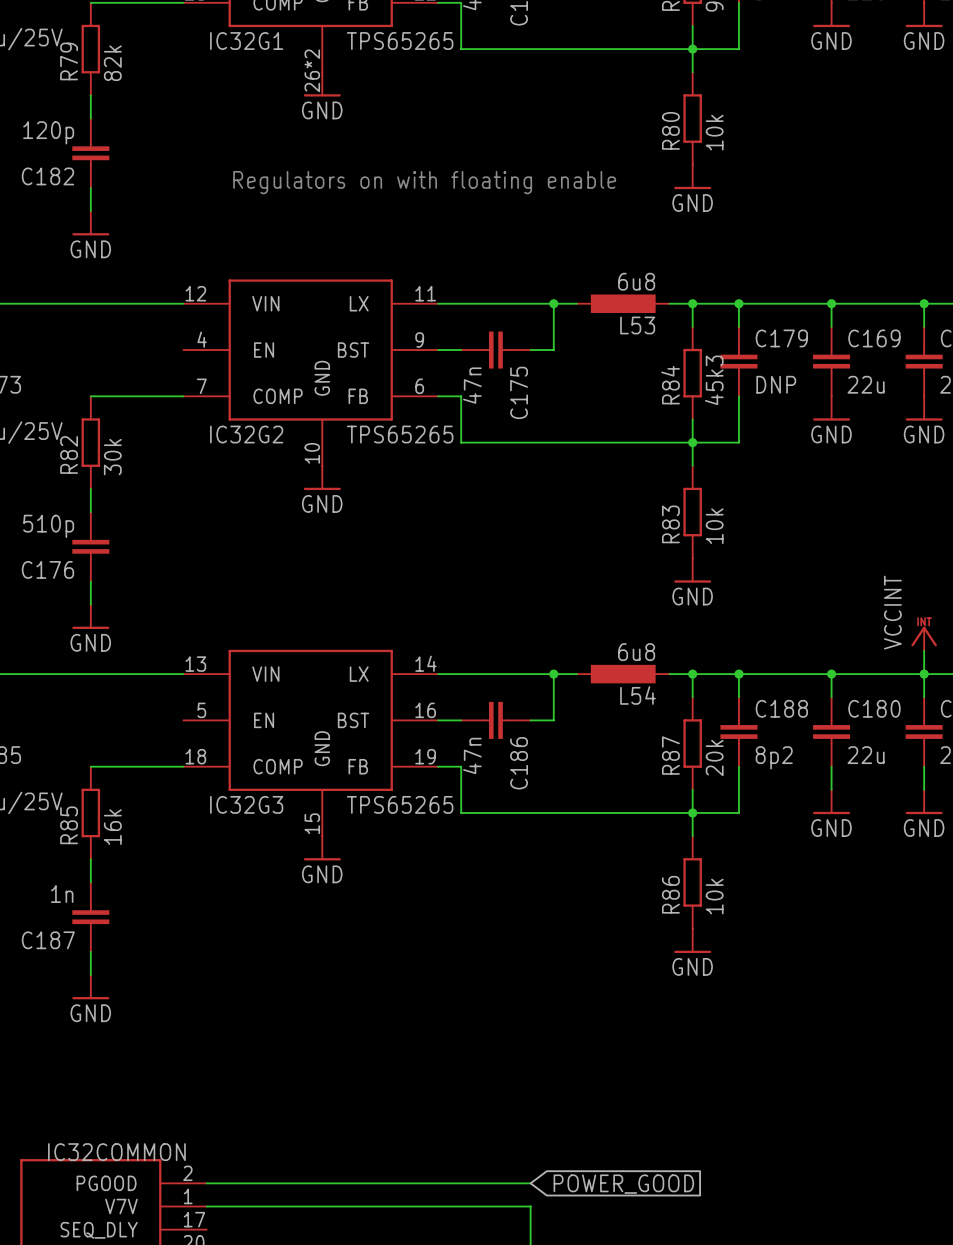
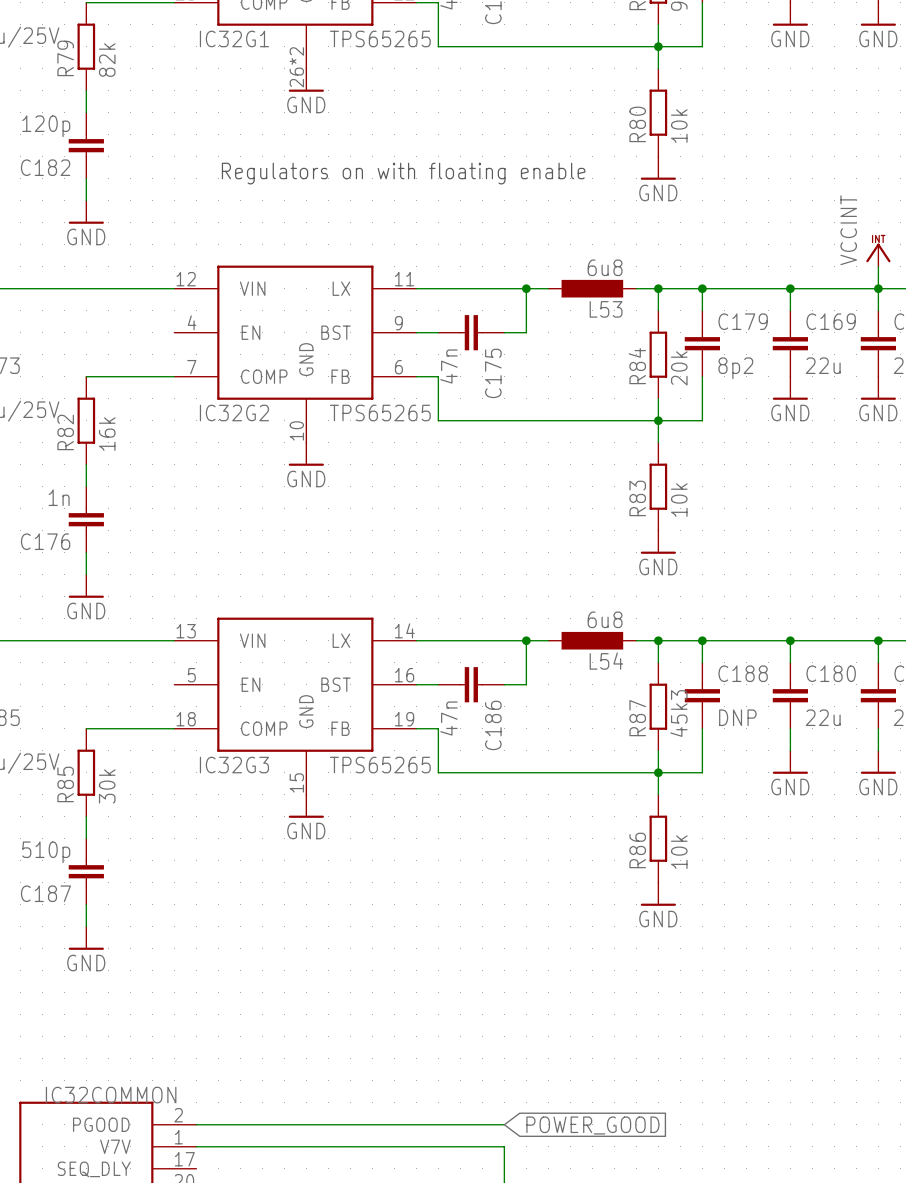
power symbol: none -> VCCINT (878, 255)
wire: none -> (878, 266) (878, 288)
R84 value: 45k3 (714, 380) -> 20k (679, 368)
C179 value: DNP (776, 384) -> 8p2 (735, 368)
R82 value: 30k (112, 457) -> 16k (107, 434)
C176 value: 510p (48, 526) -> 1n (59, 497)
power symbol: VCCINT (924, 638) -> none
wire: (924, 650) (924, 674) -> none
R87 value: 20k (714, 757) -> 45k3 (678, 713)
C188 value: 8p2 (774, 757) -> DNP (737, 717)
R85 value: 16k (112, 827) -> 30k (107, 786)
C187 value: 1n (62, 894) -> 510p (46, 852)

